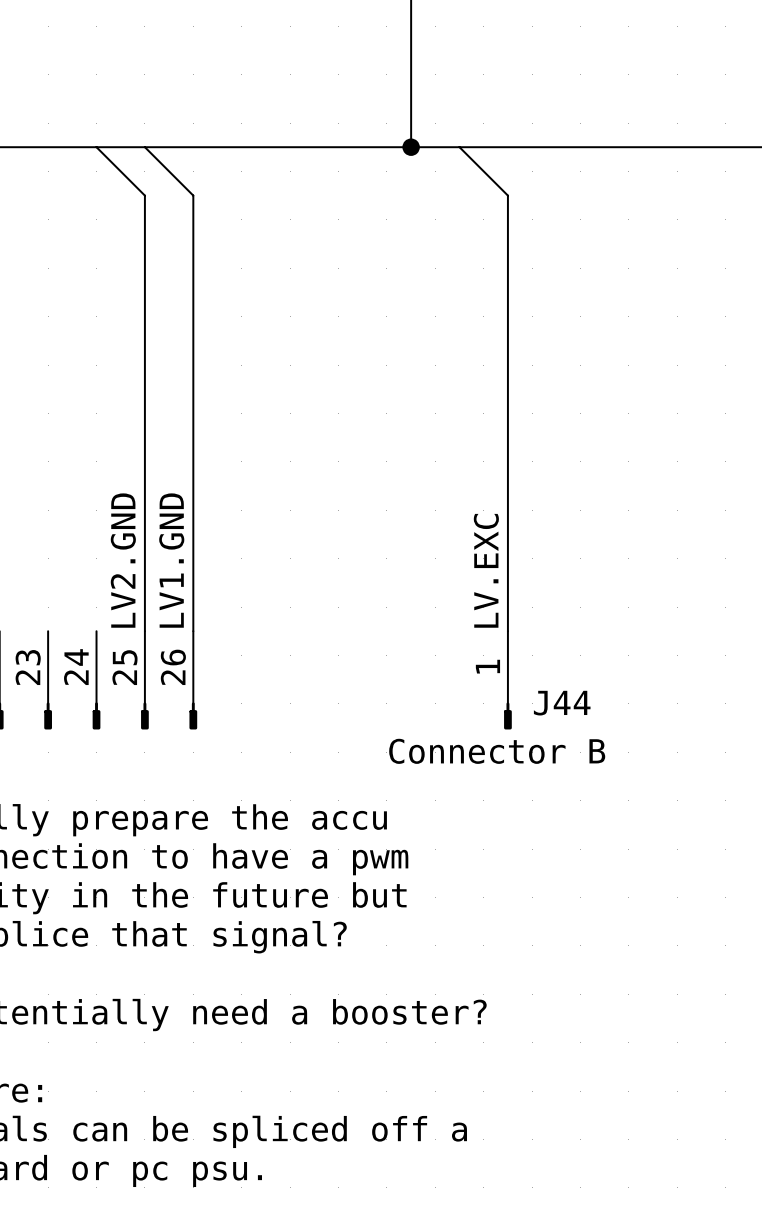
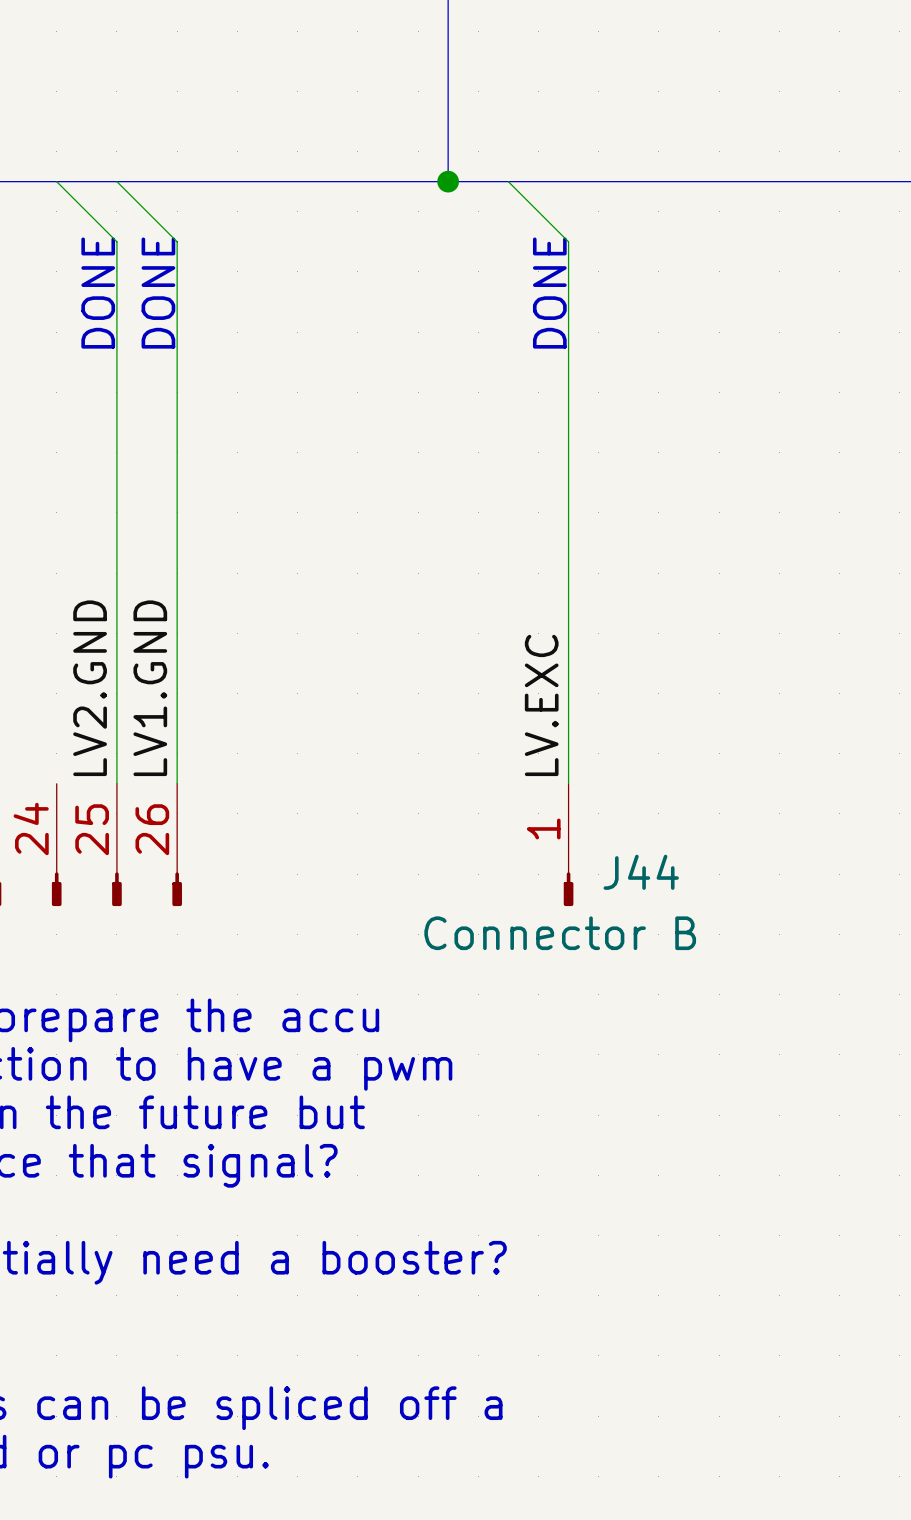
text: none -> DONE (98, 293)
text: none -> DONE (158, 293)
text: none -> DONE (549, 293)

